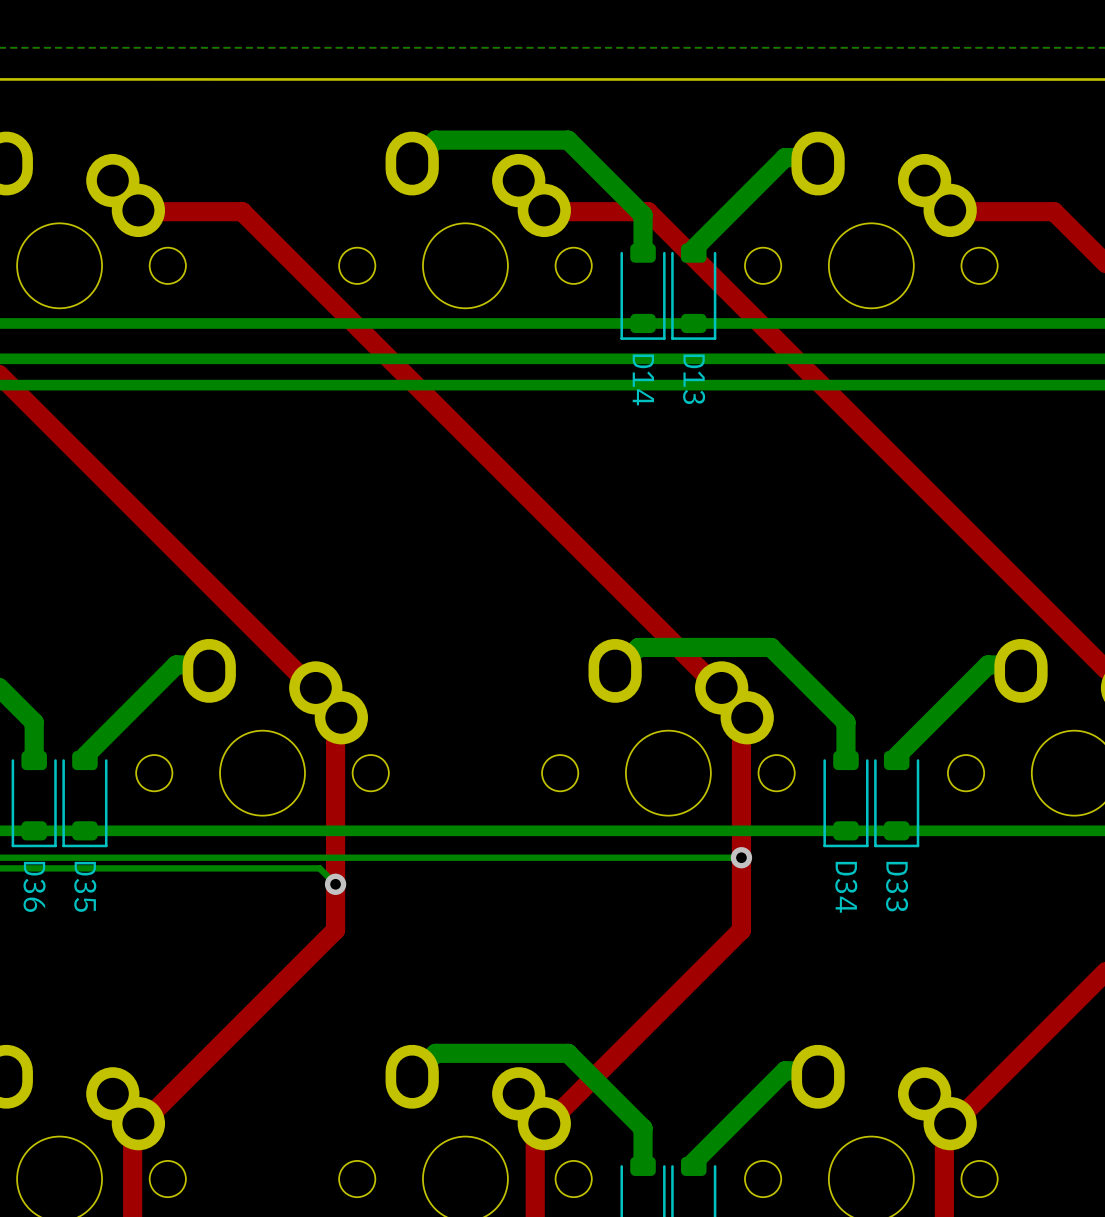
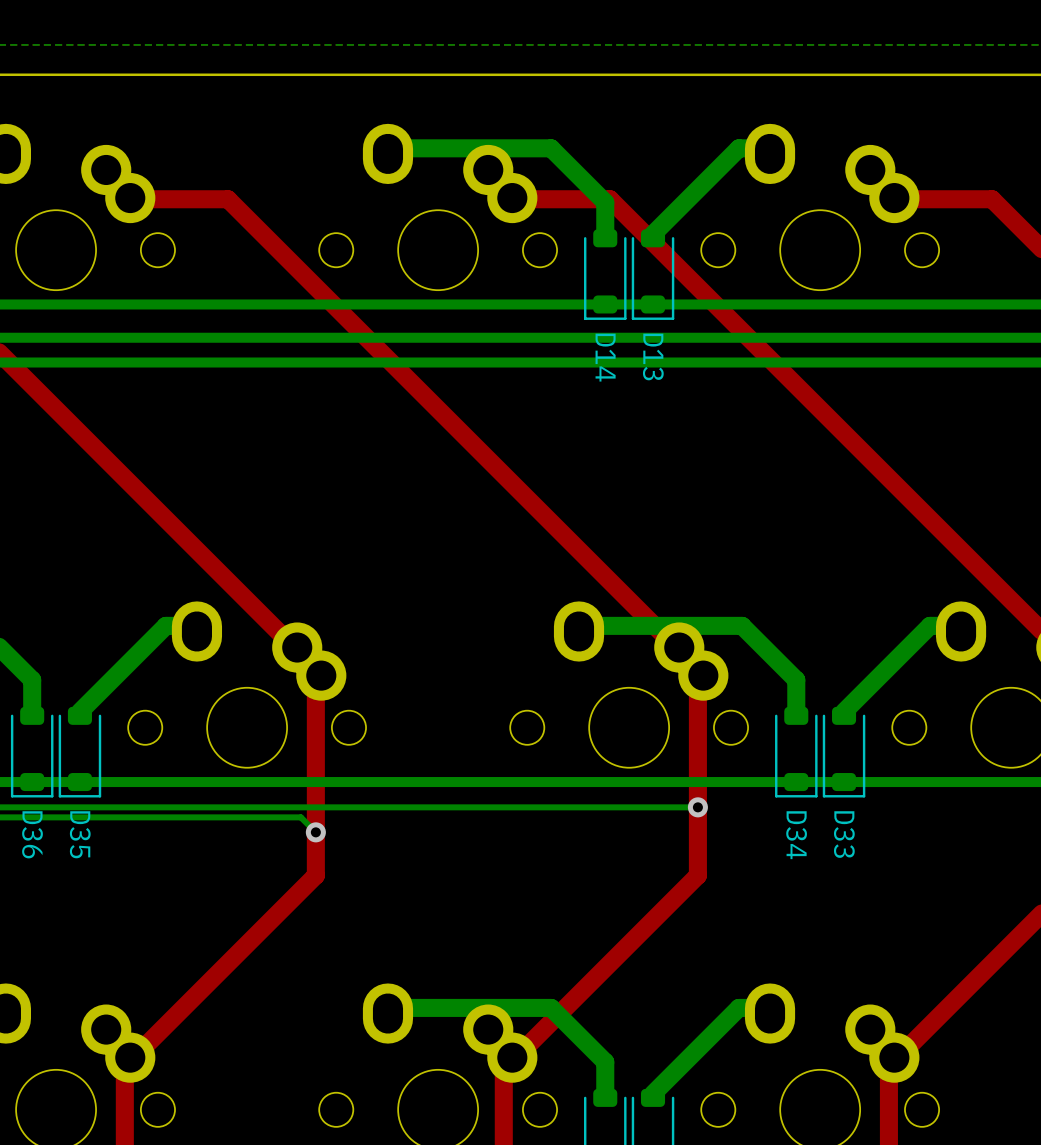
bottom track: (585, 157) (568, 140) (435, 140) (412, 163) -> (551, 148) (387, 148)
bottom track: (788, 664) (771, 647) (638, 647) (615, 670) -> (742, 625) (578, 625)
bottom track: (585, 1070) (568, 1053) (435, 1053) (412, 1076) -> (551, 1007) (387, 1007)

